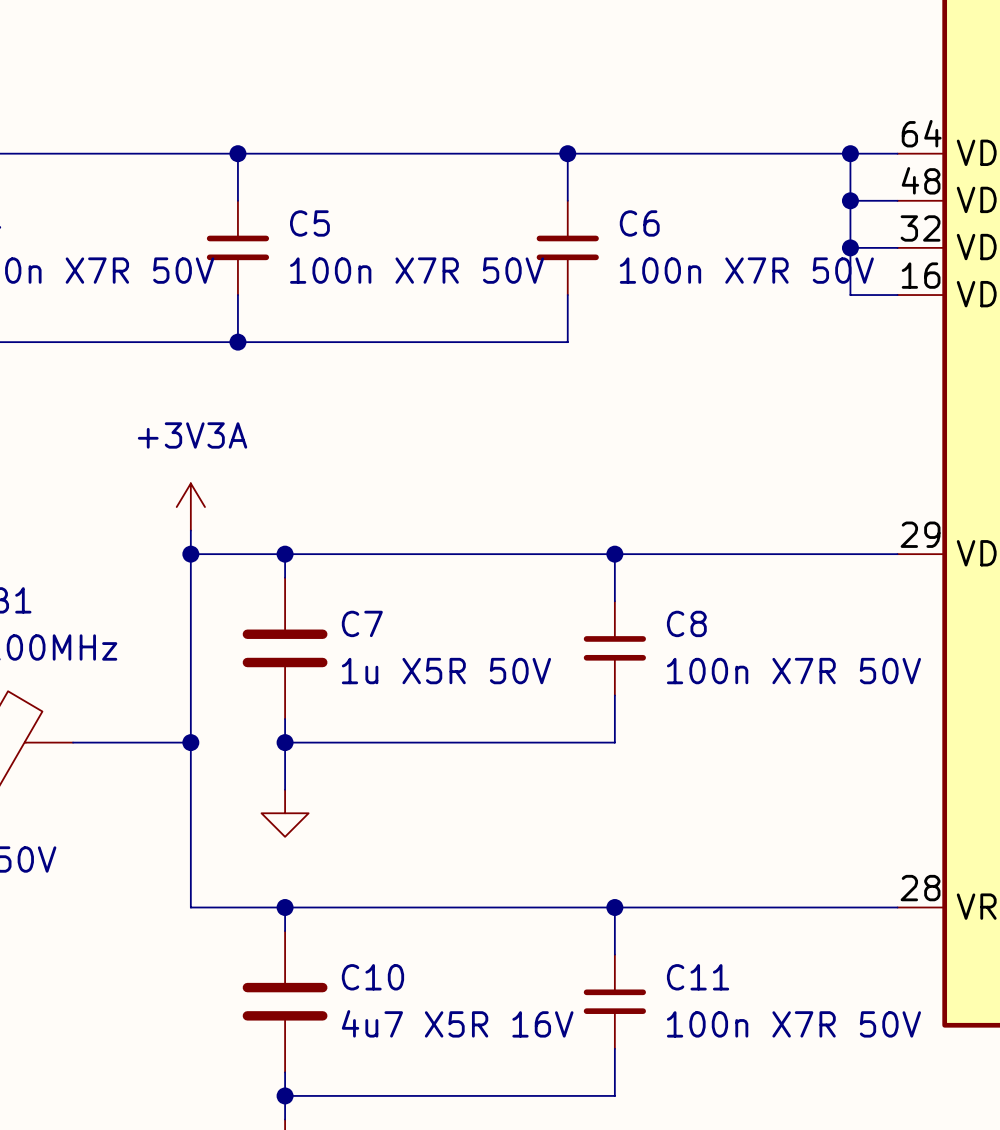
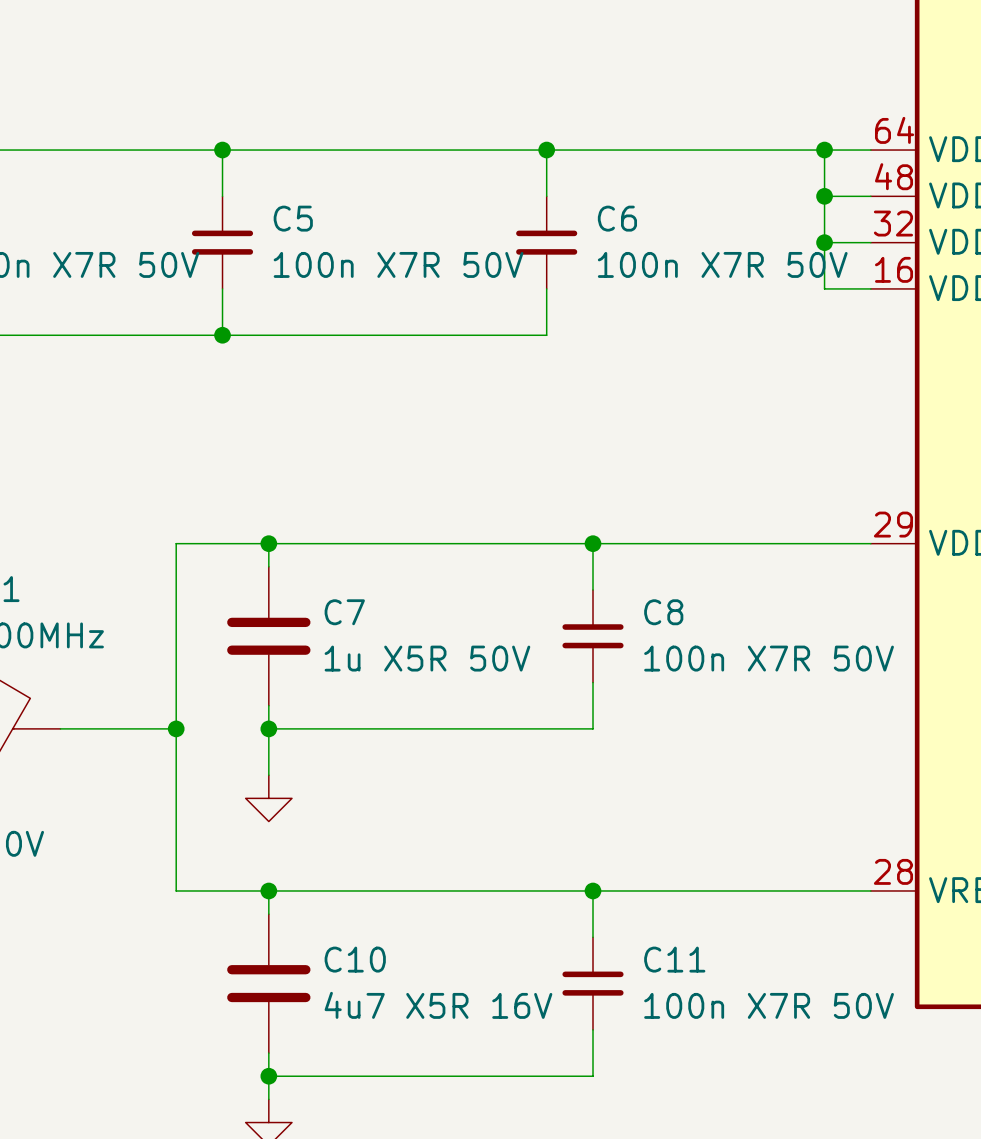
power symbol: +3V3A (190, 507) -> none
wire: (190, 530) (190, 554) -> none
junction: (190, 554) -> none

